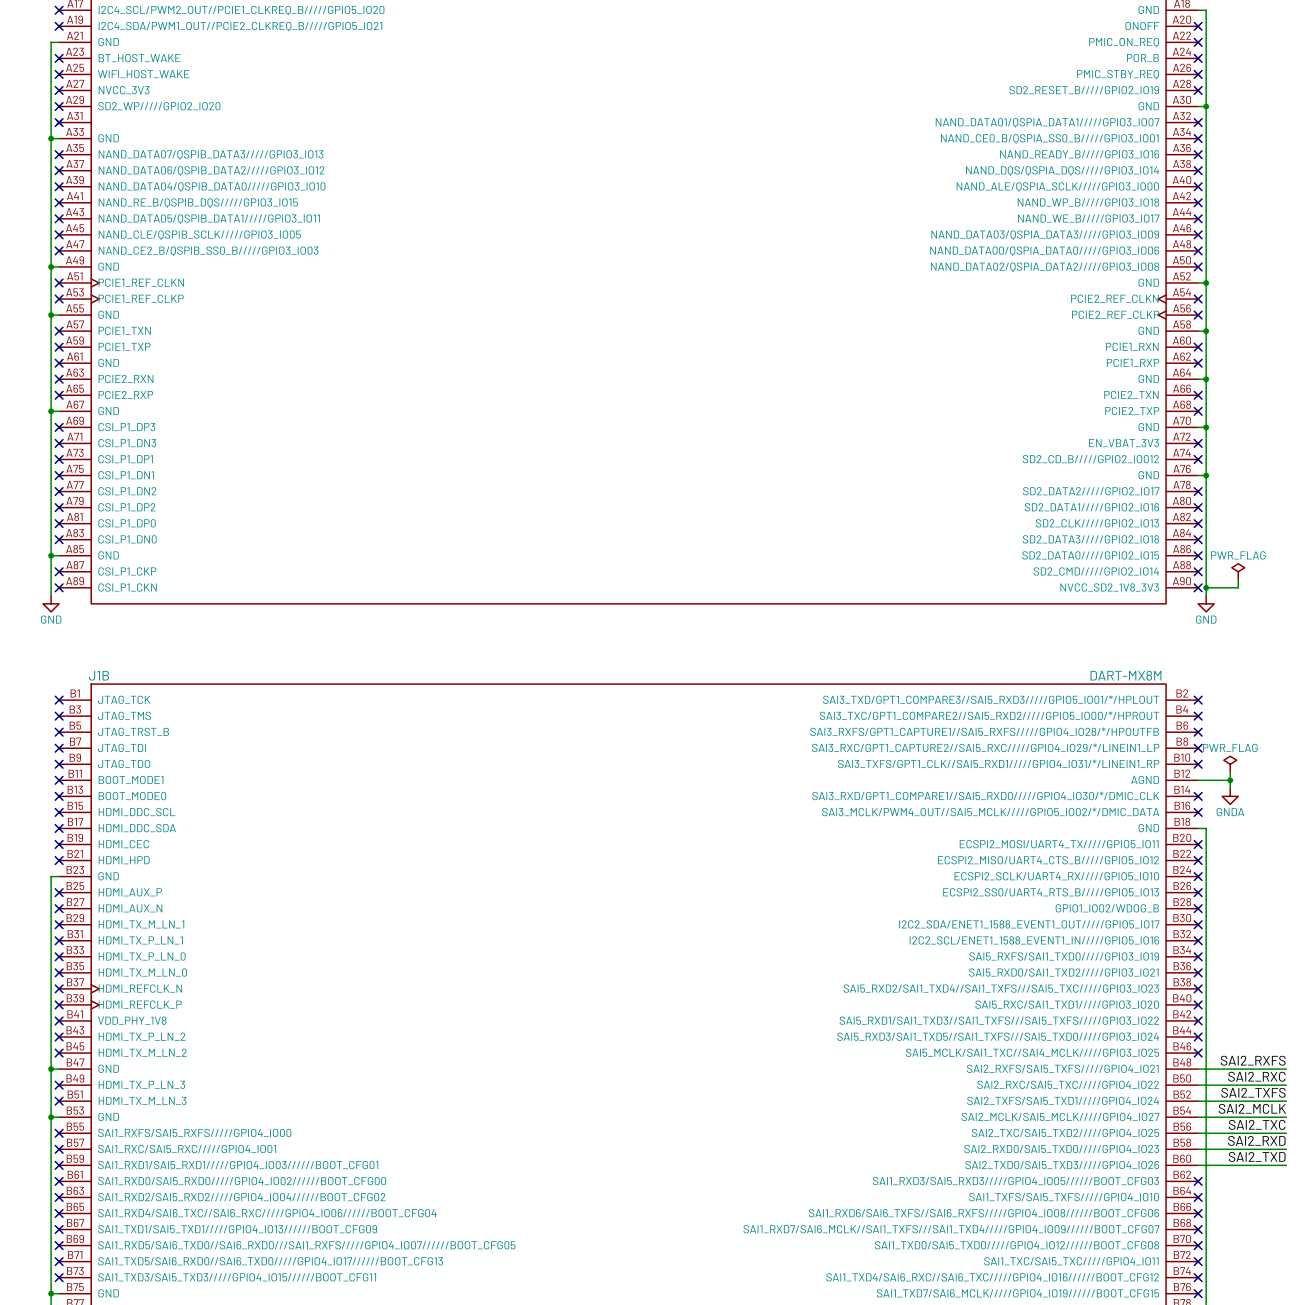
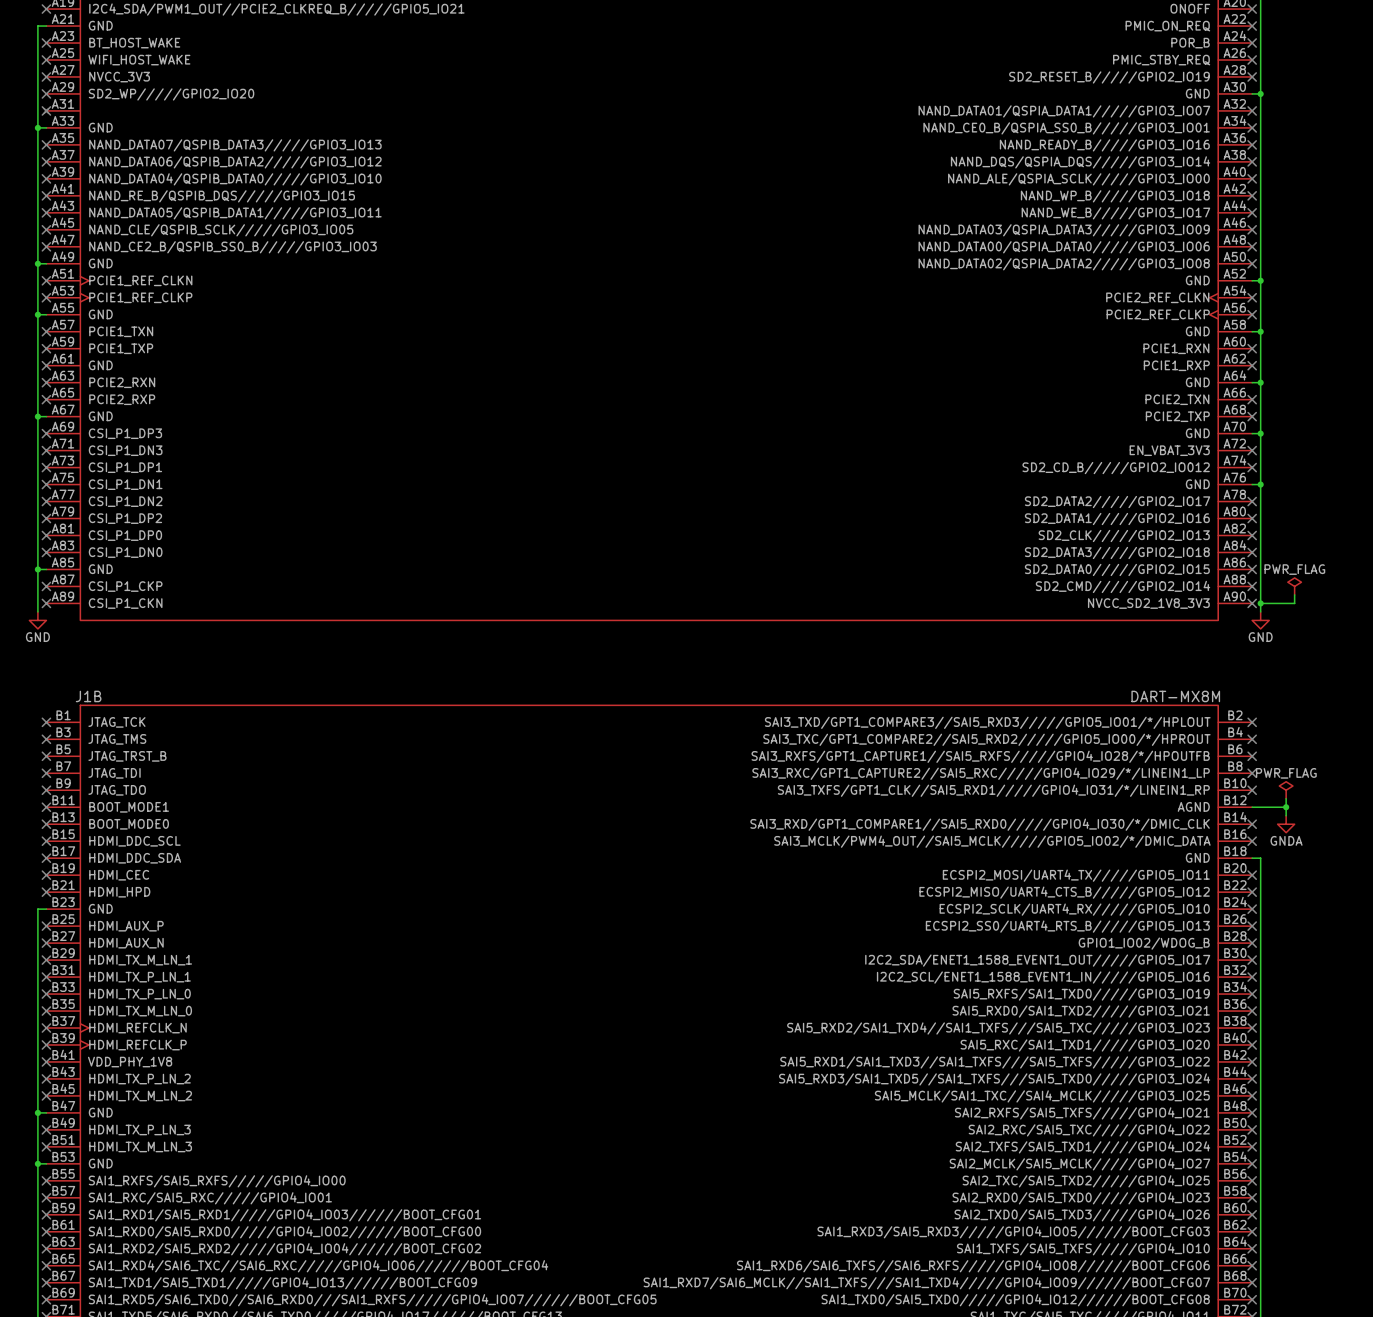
label: SAI2_RXFS (1253, 1060) -> none
wire: (1198, 1069) (1286, 1069) -> none
no-connect mark: none -> (1252, 1112)
label: SAI2_RXC (1256, 1076) -> none
wire: (1198, 1085) (1286, 1085) -> none
no-connect mark: none -> (1252, 1129)
label: SAI2_TXFS (1253, 1092) -> none
wire: (1198, 1101) (1286, 1101) -> none
no-connect mark: none -> (1252, 1146)
label: SAI2_MCLK (1252, 1108) -> none
wire: (1198, 1117) (1286, 1117) -> none
no-connect mark: none -> (1252, 1163)
label: SAI2_TXC (1257, 1124) -> none
wire: (1198, 1133) (1286, 1133) -> none
no-connect mark: none -> (1252, 1180)
label: SAI2_RXD (1256, 1140) -> none
wire: (1198, 1149) (1286, 1149) -> none
no-connect mark: none -> (1252, 1197)
label: SAI2_TXD (1257, 1156) -> none
wire: (1198, 1165) (1286, 1165) -> none
no-connect mark: none -> (1252, 1214)

